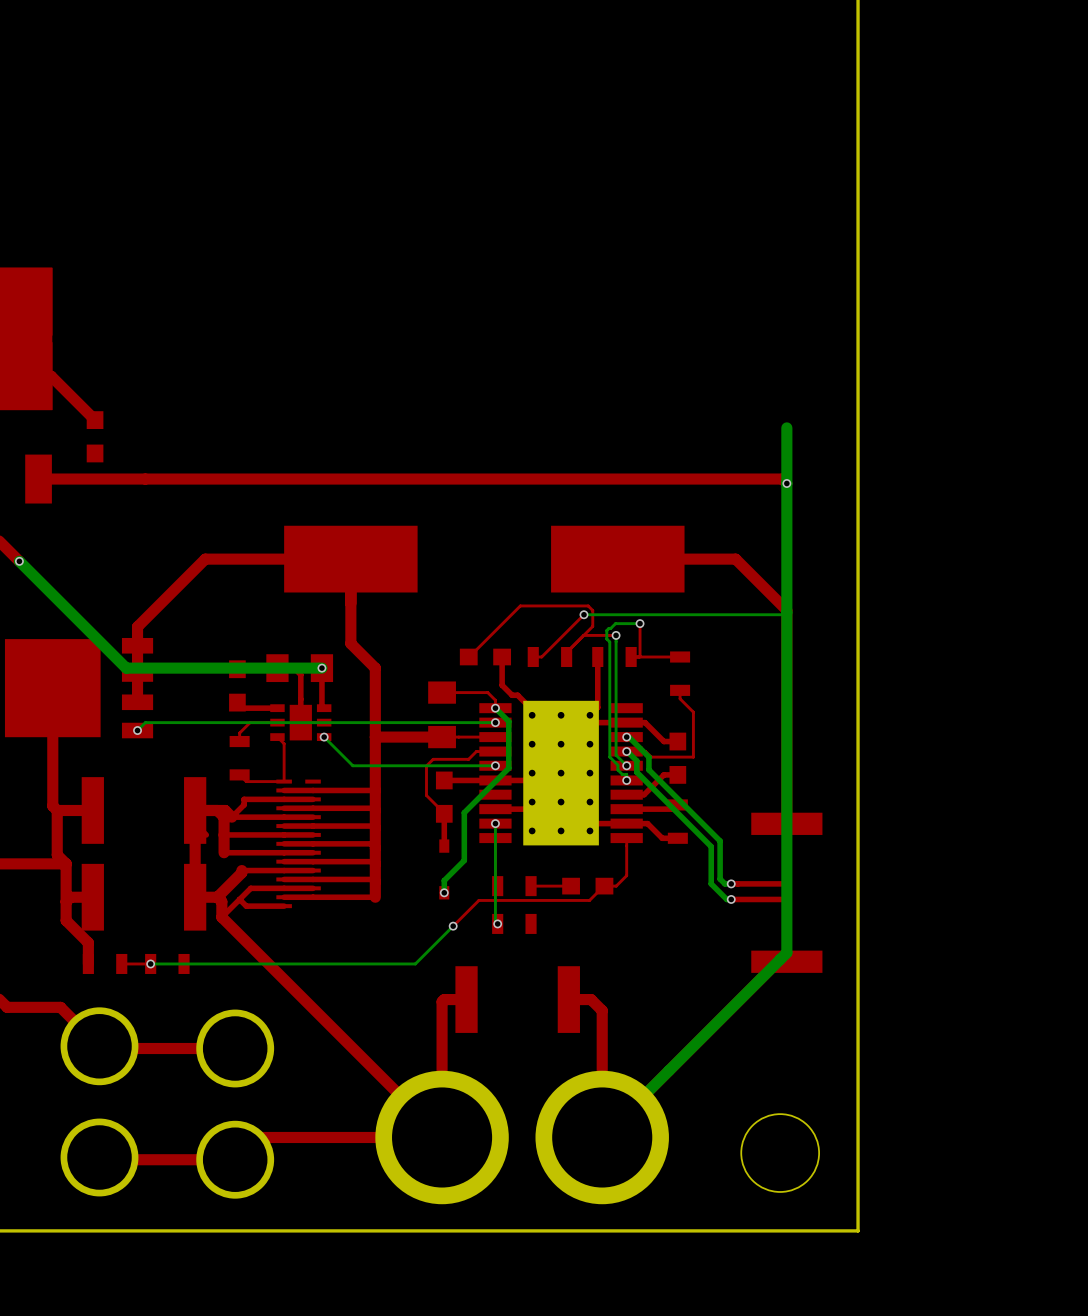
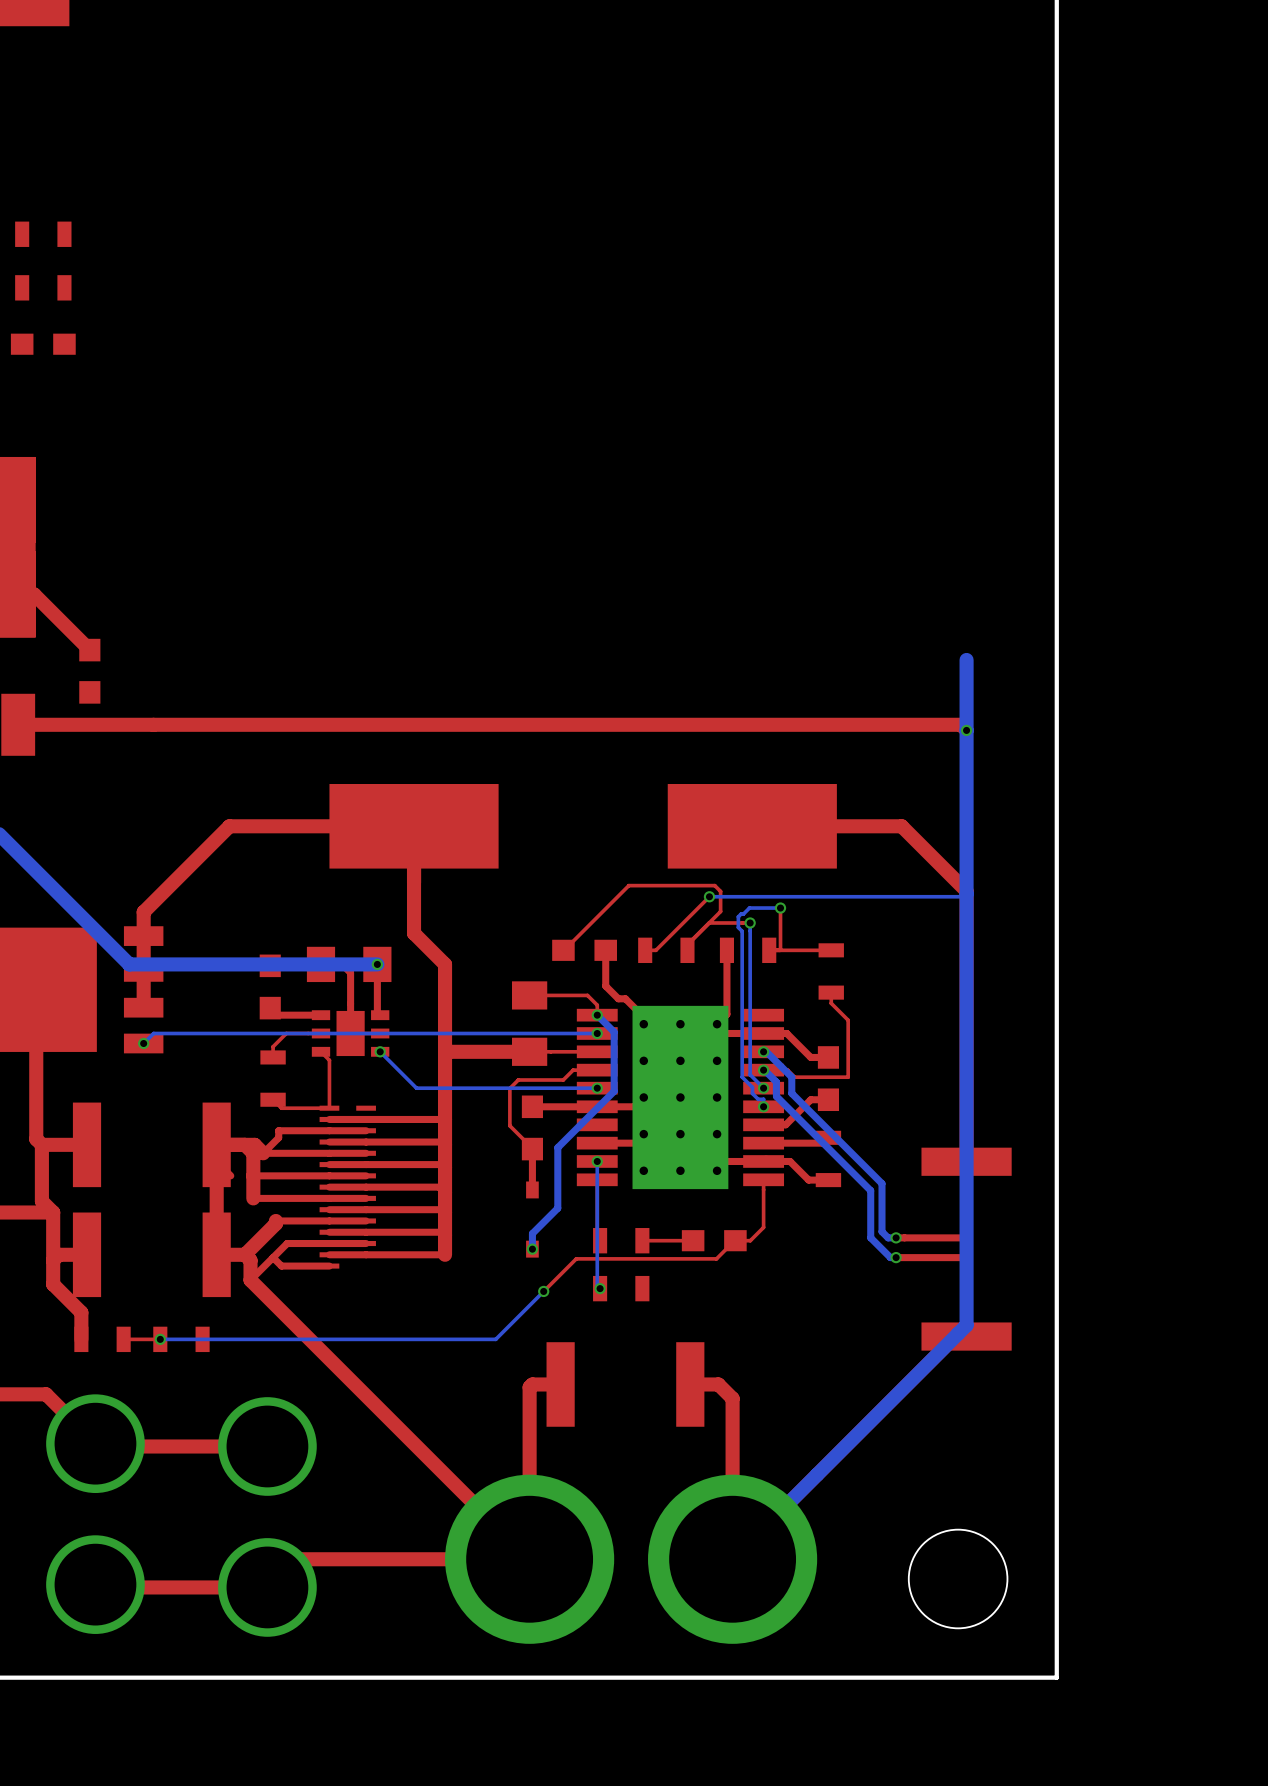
part: none -> (43, 234)
part: none -> (43, 287)
part: none -> (43, 344)

